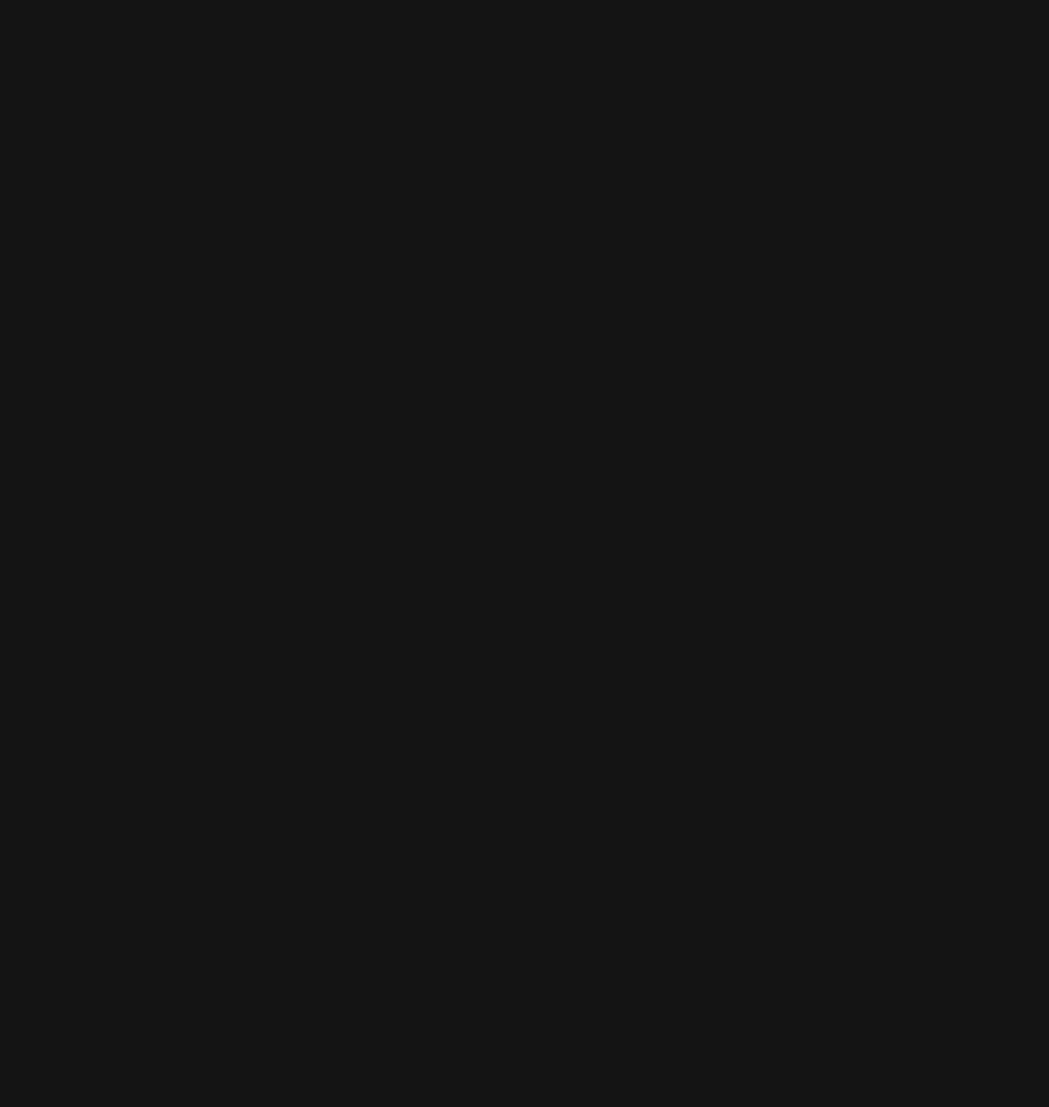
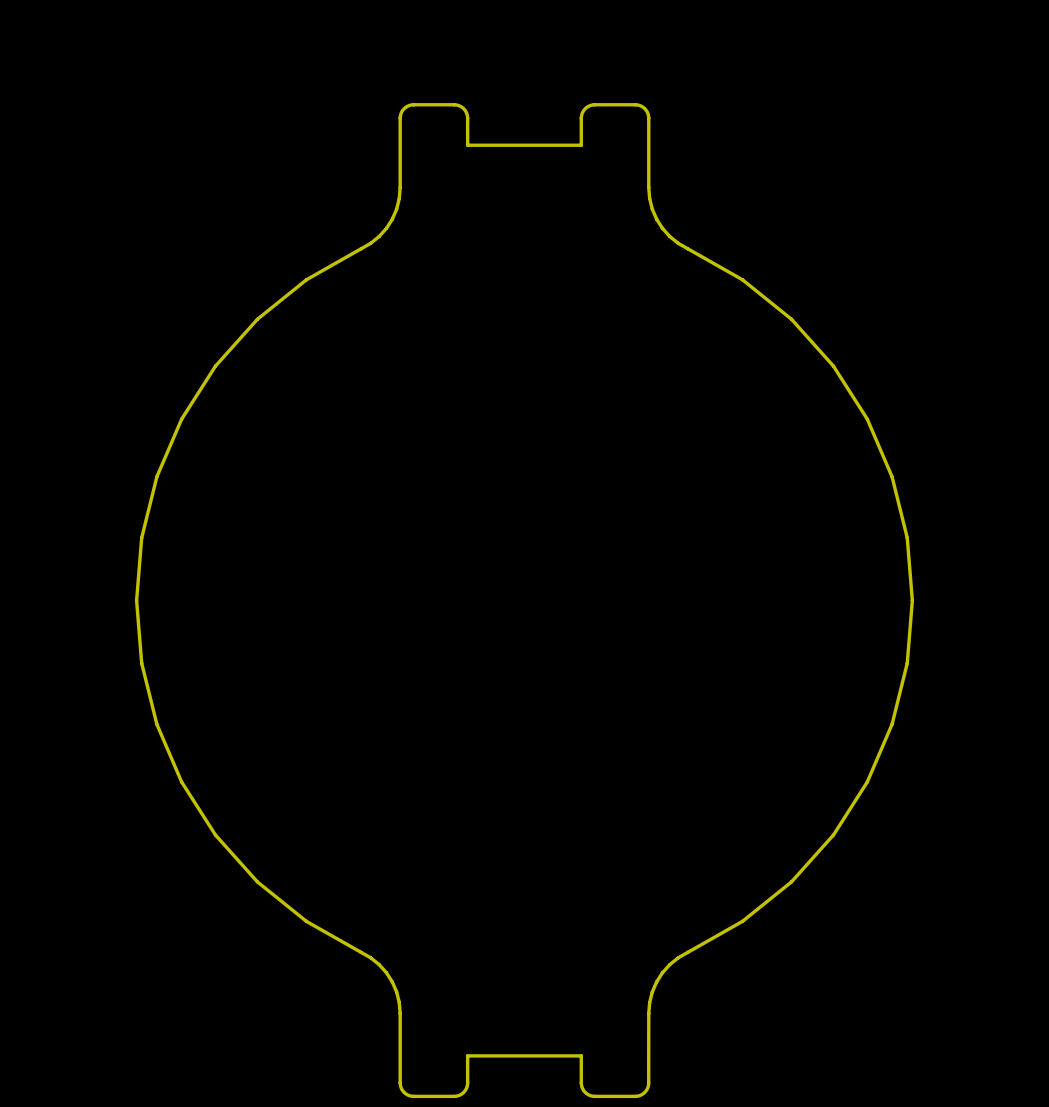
part: none -> (524, 600)

